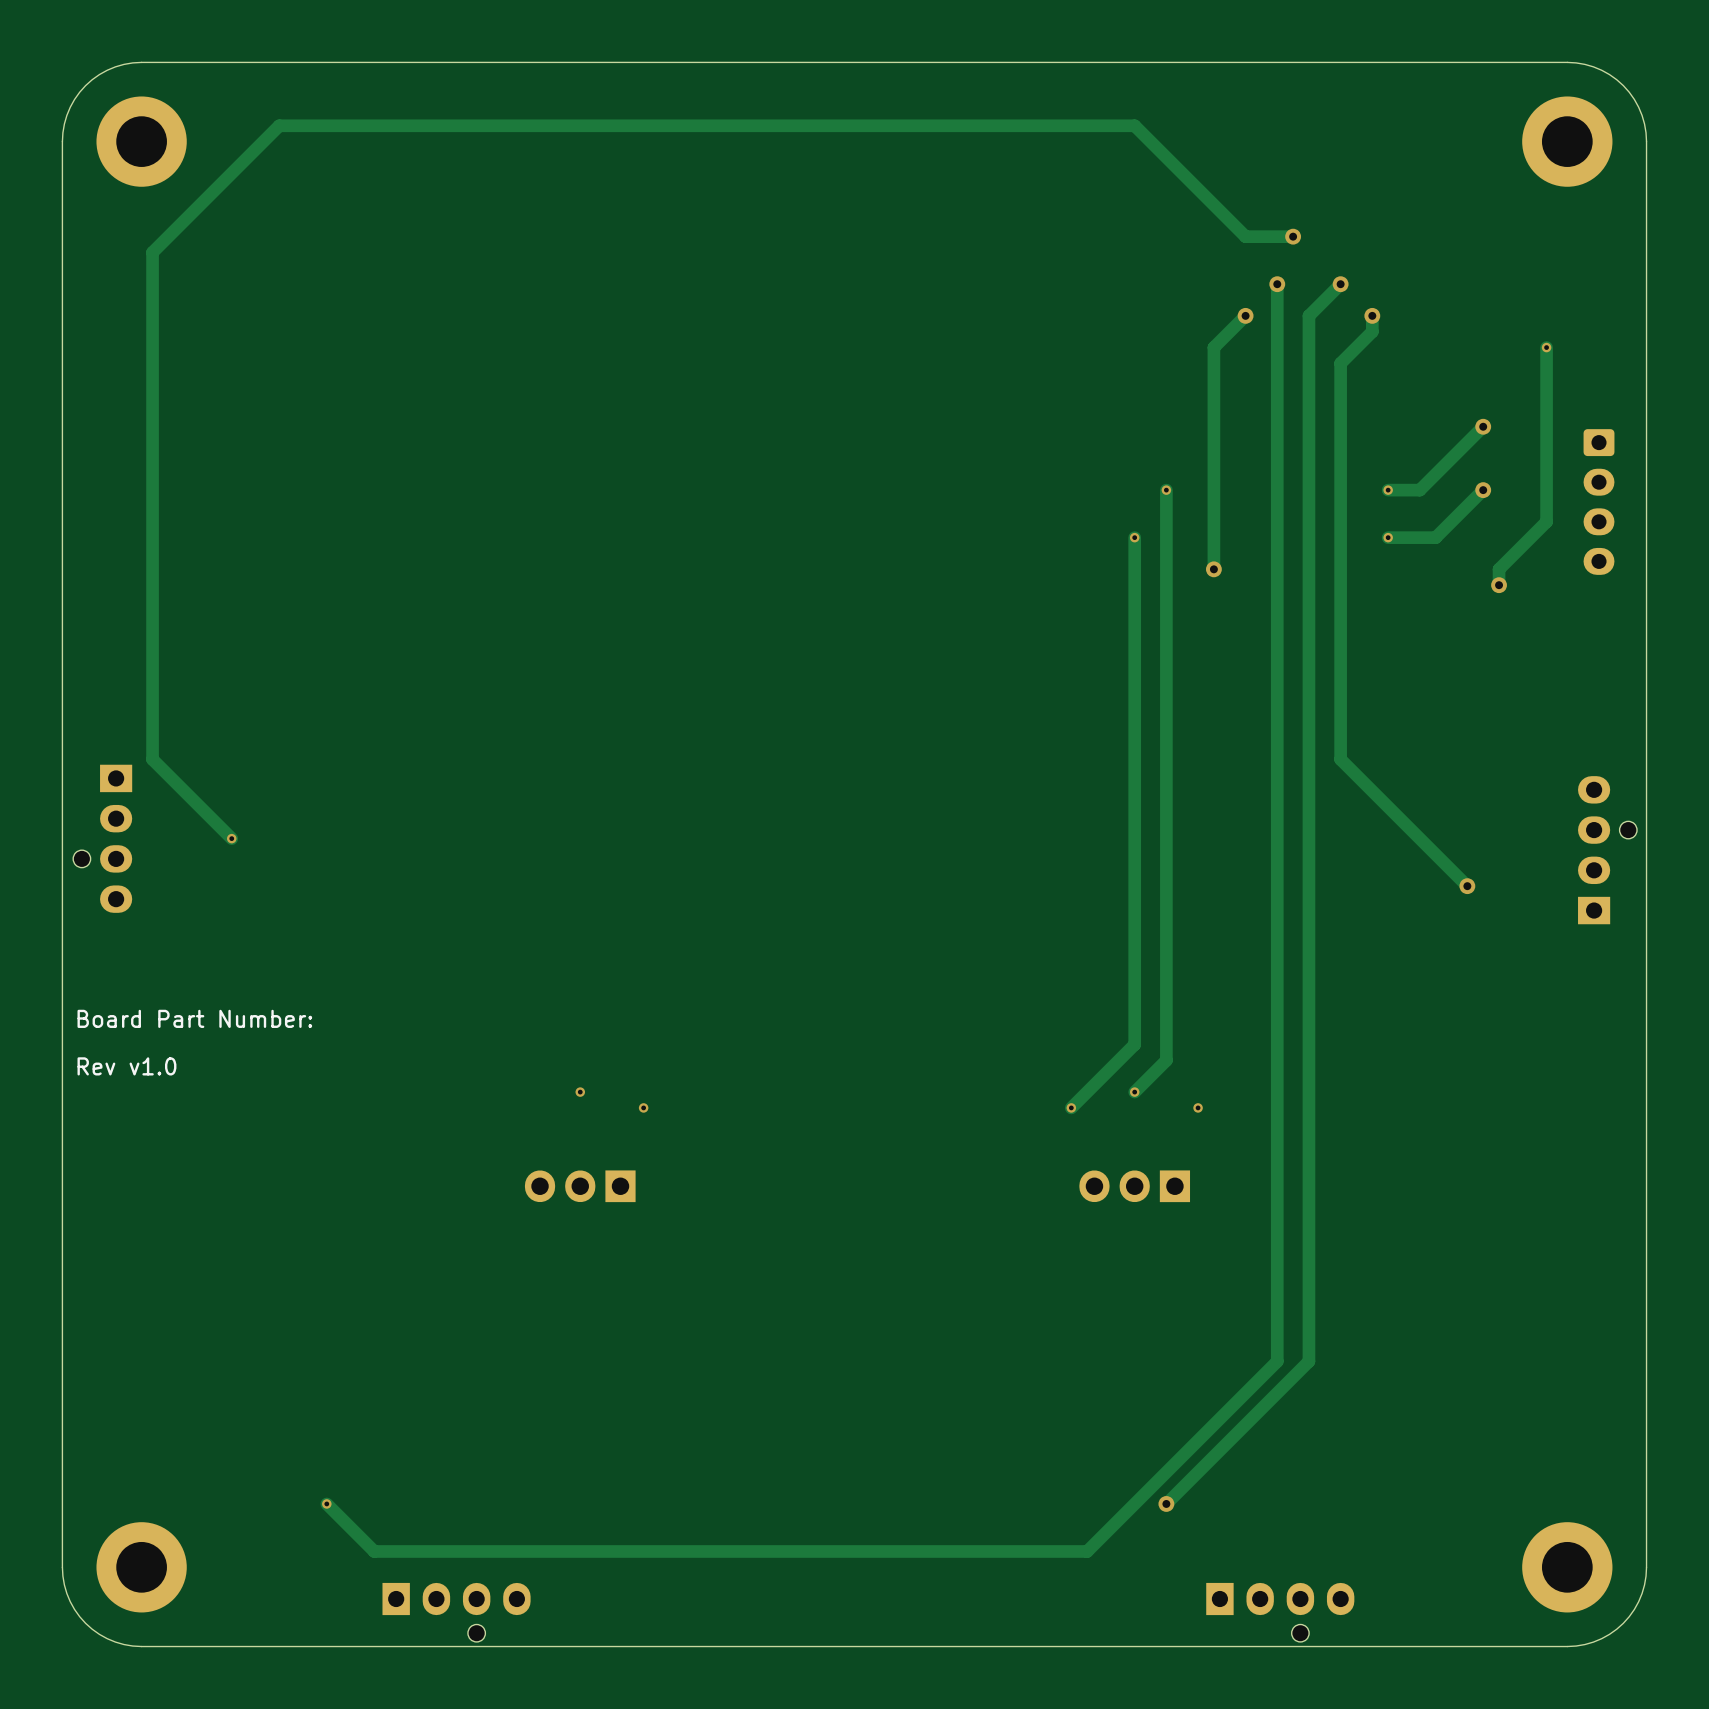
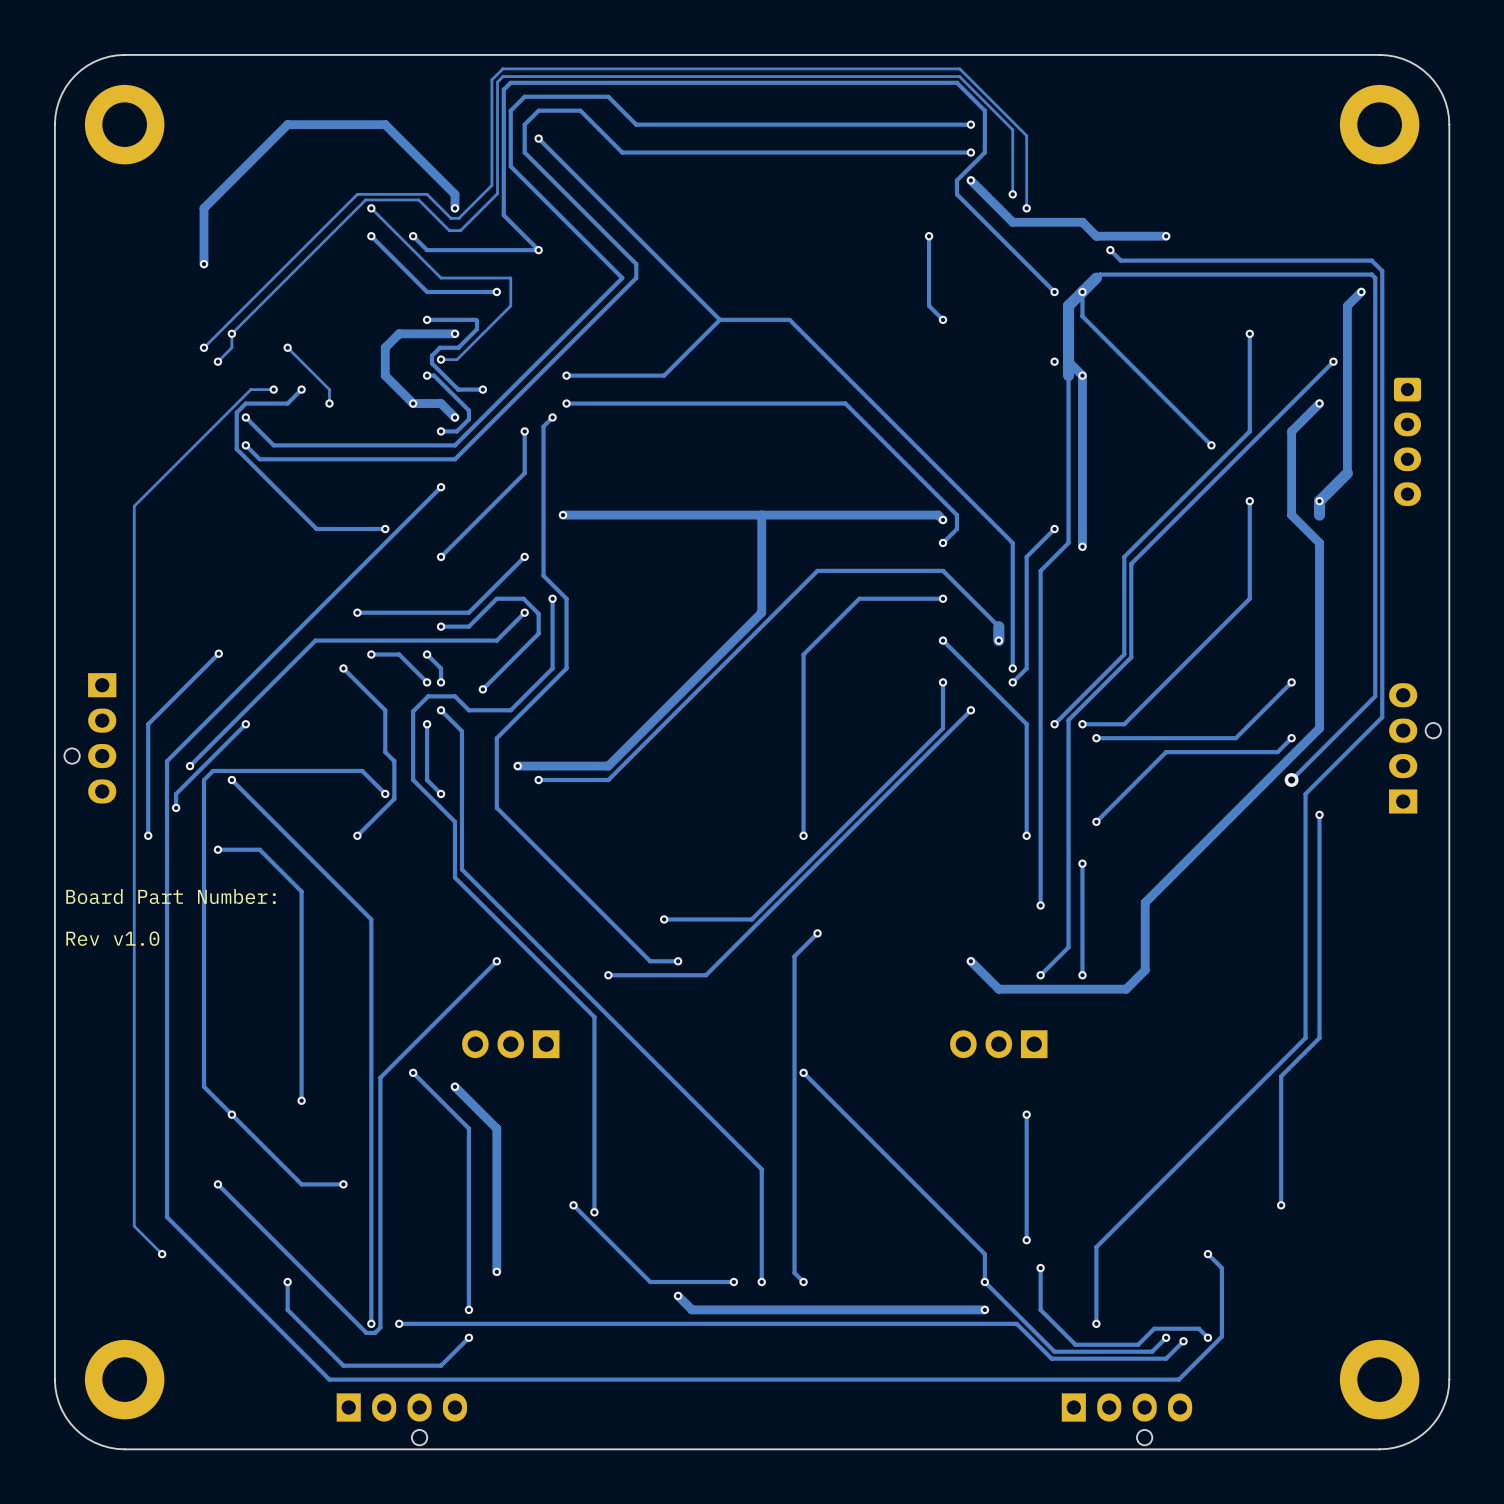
track: (611, 125) (279, 125) (152, 252) (152, 575) -> (538, 110) (524, 124) (524, 152) (636, 264) (636, 278) (454, 459) (259, 459) (245, 445)
track: (659, 125) (1134, 125) (1245, 236) (1293, 236) -> (580, 110) (622, 152) (970, 152)
track width: thick (659, 125) (611, 125) -> thin (580, 110) (538, 110)
track: none -> (970, 124) (636, 124) (608, 96) (524, 96) (510, 110) (510, 166) (622, 278) (454, 445) (273, 445) (245, 417)
via: none -> (970, 124)
track: none -> (538, 138) (719, 319)
via: none -> (538, 138)
via: none -> (970, 152)
track: none -> (970, 180) (1012, 222) (1082, 222) (1096, 236) (1166, 236)
via: none -> (970, 180)
track: none -> (1012, 194) (1012, 129) (959, 76) (503, 76) (497, 82) (497, 193) (460, 230) (449, 230) (418, 199) (365, 199) (231, 333) (231, 347) (217, 361)
via: none -> (1012, 194)
track: none -> (371, 208) (441, 278) (510, 278) (510, 305) (457, 359) (441, 359)
via: none -> (371, 208)
track: none -> (454, 208) (454, 194) (385, 124) (287, 124) (204, 208) (204, 264)
via: none -> (454, 208)
track: none -> (1026, 208) (1026, 135) (959, 68) (502, 68) (491, 79) (491, 185) (458, 218) (451, 218) (427, 194) (357, 194) (204, 347)
via: none -> (1026, 208)
via: (1293, 236) -> none
track: none -> (371, 236) (427, 291) (496, 291)
via: none -> (371, 236)
track: none -> (413, 236) (427, 250) (538, 250) (503, 215) (503, 89) (510, 82) (956, 82) (984, 110) (984, 152) (956, 180) (956, 194) (1054, 291)
via: none -> (413, 236)
track: none -> (929, 236) (929, 305) (943, 319)
via: none -> (929, 236)
via: none -> (1166, 236)
via: none -> (538, 250)
track: none -> (1110, 250) (1120, 260) (1371, 260) (1382, 271) (1382, 717) (1305, 793) (1305, 1037) (1096, 1247) (1096, 1323)
via: none -> (1110, 250)
track: (1277, 284) (1277, 632) -> (1249, 333) (1249, 431) (1124, 556)
via: (1277, 284) -> none
track: (1340, 284) (1308, 315) (1308, 1361) (1166, 1503) -> none
via: (1340, 284) -> none
via: none -> (204, 264)
via: (1245, 315) -> none
track: (1372, 315) (1372, 331) (1340, 363) (1340, 759) (1467, 886) -> (1096, 278) (1099, 274) (1371, 274) (1375, 278) (1375, 696) (1291, 780)
via: (1372, 315) -> none
via: none -> (496, 291)
via: none -> (1054, 291)
track: none -> (1082, 291) (1082, 316) (1211, 445)
via: none -> (1082, 291)
track: (1546, 347) (1546, 521) (1530, 537) -> (1361, 291) (1347, 305) (1347, 473)
via position: (1546, 347) -> (1361, 291)
track: none -> (427, 319) (477, 320) (477, 329) (458, 347) (440, 347) (431, 355) (431, 363) (458, 389) (482, 389)
via: none -> (427, 319)
track: none -> (719, 319) (789, 319) (1012, 542) (1012, 668)
track: none -> (719, 319) (664, 375) (566, 375)
via: none -> (943, 319)
via: none -> (231, 333)
track: none -> (454, 333) (399, 333) (385, 347) (385, 375) (413, 403) (441, 403) (454, 417)
via: none -> (454, 333)
via: none -> (1249, 333)
via: none -> (204, 347)
track: none -> (287, 347) (329, 389) (329, 403)
via: none -> (287, 347)
via: none -> (441, 359)
via: none -> (217, 361)
via: none -> (1054, 361)
track: none -> (1068, 361) (1082, 375) (1082, 546)
track: none -> (1333, 361) (1131, 563) (1131, 657) (1068, 720) (1068, 947) (1040, 975)
via: none -> (1333, 361)
track: none -> (427, 375) (434, 375) (468, 410) (468, 419) (456, 431) (441, 431)
via: none -> (427, 375)
via: none -> (566, 375)
track width: thick (1213, 426) (1213, 569) -> thin (1068, 375) (1068, 501)
via: none -> (1082, 375)
track: (1483, 426) (1419, 490) (1388, 490) -> none
via: (1483, 426) -> none
track: none -> (273, 389) (250, 389) (134, 506)
via: none -> (273, 389)
track: none -> (301, 389) (287, 403) (245, 403) (236, 412) (236, 449) (316, 529) (385, 529)
via: none -> (301, 389)
via: none -> (482, 389)
via: none -> (329, 403)
via: none -> (413, 403)
track: none -> (566, 403) (845, 403) (956, 515) (956, 529) (943, 542)
via: none -> (566, 403)
track: none -> (1319, 403) (1291, 431) (1291, 515) (1319, 542) (1319, 728) (1145, 902) (1145, 970) (1126, 989) (998, 989) (970, 961)
via: none -> (1319, 403)
via: none -> (245, 417)
via: none -> (454, 417)
track: none -> (552, 417) (543, 426) (543, 575) (566, 598) (566, 668) (496, 738) (496, 807) (650, 961) (678, 961)
via: none -> (552, 417)
via: none -> (441, 431)
track: none -> (524, 431) (524, 473) (441, 556)
via: none -> (524, 431)
track: (1166, 490) (1166, 632) -> (1054, 529) (1026, 556)
via: (1166, 490) -> none
via: (1388, 490) -> none
track: (1483, 490) (1435, 537) (1388, 537) -> none
via: (1483, 490) -> none
via: none -> (245, 445)
via: none -> (1211, 445)
track: (1134, 537) (1134, 711) -> (538, 780) (608, 780) (817, 570) (943, 570) (998, 626)
via: (1134, 537) -> none
via: (1388, 537) -> none
track: none -> (441, 487) (167, 761) (167, 1217) (329, 1379) (1178, 1379) (1221, 1336) (1221, 1268) (1207, 1254)
via: none -> (441, 487)
track: none -> (1068, 501) (1068, 542) (1040, 570) (1040, 905)
via: (1213, 569) -> none
track: none -> (1249, 501) (1249, 598) (1124, 724) (1082, 724)
via: none -> (1249, 501)
via: none -> (1319, 501)
track width: thick (152, 575) (152, 759) -> thin (134, 506) (134, 668)
track: none -> (563, 515) (938, 515) (943, 519)
via: none -> (563, 515)
track: none -> (761, 515) (761, 612) (608, 766) (517, 766)
via: (1499, 585) -> none
via: none -> (943, 519)
via: none -> (385, 529)
via: none -> (1054, 529)
via: none -> (943, 542)
via: none -> (1082, 546)
via: none -> (441, 556)
track: none -> (524, 556) (468, 612) (357, 612)
via: none -> (524, 556)
track width: thick (1166, 632) (1166, 759) -> thin (1026, 556) (1026, 668)
track width: thick (1277, 632) (1277, 743) -> thin (1124, 556) (1124, 654)
track: none -> (552, 598) (552, 668) (510, 710) (468, 710) (454, 696) (428, 696) (413, 711) (413, 780) (454, 821) (454, 877) (594, 1017) (594, 1212)
via: none -> (552, 598)
track: none -> (943, 598) (859, 598) (803, 654) (803, 835)
via: none -> (943, 598)
via: none -> (357, 612)
track: none -> (524, 612) (496, 640) (315, 640) (190, 766)
via: none -> (524, 612)
track: none -> (441, 626) (468, 626) (496, 598) (523, 598) (538, 613) (538, 633) (482, 689)
via: none -> (441, 626)
track: none -> (943, 640) (1026, 724)
via: none -> (943, 640)
track: (1134, 727) (1134, 1044) (1071, 1107) -> none
via: none -> (998, 640)
track: none -> (218, 653) (148, 724) (148, 835)
via: none -> (218, 653)
track: none -> (371, 654) (399, 654) (427, 682)
via: none -> (371, 654)
track: none -> (427, 654) (441, 668) (441, 682)
via: none -> (427, 654)
track: (1277, 743) (1277, 1361) (1087, 1551) (501, 1551) -> (1124, 654) (1054, 724)
track: (152, 759) (231, 838) -> (134, 668) (134, 1226) (162, 1254)
track: none -> (343, 668) (385, 710) (385, 752) (394, 761) (394, 798) (357, 835)
via: none -> (343, 668)
via: none -> (1012, 668)
track: (1166, 759) (1166, 822) -> (1026, 668) (1012, 682)
via: none -> (427, 682)
via: none -> (441, 682)
track: none -> (943, 682) (943, 728) (751, 919) (664, 919)
via: none -> (943, 682)
via: none -> (1012, 682)
track: none -> (1291, 682) (1235, 738) (1096, 738)
via: none -> (1291, 682)
via: none -> (482, 689)
track: none -> (441, 710) (461, 731) (461, 869) (761, 1169) (761, 1282)
via: none -> (441, 710)
track: none -> (970, 710) (705, 975) (608, 975)
via: none -> (970, 710)
track: none -> (245, 724) (176, 793) (176, 807)
via: none -> (245, 724)
track: none -> (427, 724) (427, 780) (441, 793)
via: none -> (427, 724)
track width: thick (1166, 822) (1166, 949) -> thin (1026, 724) (1026, 835)
via: none -> (1054, 724)
via: none -> (1082, 724)
via: (231, 838) -> none
via: none -> (1096, 738)
track: none -> (1291, 738) (1277, 752) (1166, 752) (1096, 821)
via: none -> (1291, 738)
via: none -> (190, 766)
via: none -> (517, 766)
track: none -> (231, 780) (371, 919) (371, 1323)
via: none -> (231, 780)
via: none -> (538, 780)
track: none -> (385, 793) (362, 770) (213, 770) (204, 780) (204, 1086) (301, 1184) (343, 1184)
via: none -> (385, 793)
via: none -> (441, 793)
via: none -> (176, 807)
track: none -> (1319, 814) (1319, 1037) (1281, 1076) (1281, 1205)
via: none -> (1319, 814)
via: none -> (1096, 821)
via: none -> (148, 835)
via: none -> (357, 835)
via: none -> (803, 835)
track: (1166, 949) (1166, 1060) (1134, 1092) -> none
via: none -> (1026, 835)
track: none -> (217, 849) (259, 849) (301, 891) (301, 1100)
via: none -> (217, 849)
track: none -> (1082, 863) (1082, 975)
via: none -> (1082, 863)
via: none -> (1040, 905)
via: none -> (664, 919)
track: none -> (817, 933) (794, 956) (794, 1272) (803, 1282)
via: none -> (817, 933)
track: none -> (496, 961) (380, 1077) (380, 1327) (375, 1332) (366, 1332) (217, 1184)
via position: (580, 1092) -> (496, 961)
via: none -> (678, 961)
via: none -> (970, 961)
via: (1134, 1092) -> none
via: (643, 1107) -> none
via: none -> (608, 975)
via: (1071, 1107) -> none
via: none -> (1040, 975)
via: (1198, 1107) -> none
via: none -> (1082, 975)
track: none -> (413, 1072) (468, 1128) (468, 1309)
via: none -> (413, 1072)
track: none -> (803, 1072) (984, 1254) (984, 1282) (1054, 1351) (1152, 1351) (1166, 1337)
via: none -> (803, 1072)
track: none -> (454, 1086) (496, 1128) (496, 1271)
via: none -> (454, 1086)
via: none -> (301, 1100)
via: none -> (231, 1114)
track: none -> (1026, 1114) (1026, 1240)
via: none -> (1026, 1114)
via: none -> (217, 1184)
via: none -> (343, 1184)
track: none -> (573, 1205) (650, 1282) (733, 1282)
via: none -> (573, 1205)
via: none -> (1281, 1205)
via: none -> (594, 1212)
via: none -> (1026, 1240)
via: none -> (162, 1254)
via: none -> (1207, 1254)
track: none -> (1040, 1268) (1040, 1309) (1075, 1344) (1138, 1344) (1154, 1328) (1198, 1328) (1207, 1337)
via: none -> (1040, 1268)
via: none -> (496, 1271)
via: none -> (287, 1282)
via: none -> (733, 1282)
via: none -> (761, 1282)
via: none -> (803, 1282)
via: none -> (984, 1282)
track: none -> (678, 1295) (692, 1309) (984, 1309)
via: none -> (678, 1295)
via: none -> (468, 1309)
via: none -> (984, 1309)
track: (326, 1503) (374, 1551) (390, 1551) -> (287, 1282) (287, 1309) (343, 1365)
via: (326, 1503) -> none
via: none -> (371, 1323)
track: none -> (399, 1323) (1016, 1323) (1051, 1358) (1166, 1358) (1183, 1341)
via: none -> (399, 1323)
via: (1166, 1503) -> none
via: none -> (1096, 1323)
track: none -> (468, 1337) (441, 1365)
via: none -> (468, 1337)
via: none -> (1166, 1337)
via: none -> (1207, 1337)
via: none -> (1183, 1341)
track width: thick (501, 1551) (390, 1551) -> thin (441, 1365) (343, 1365)

